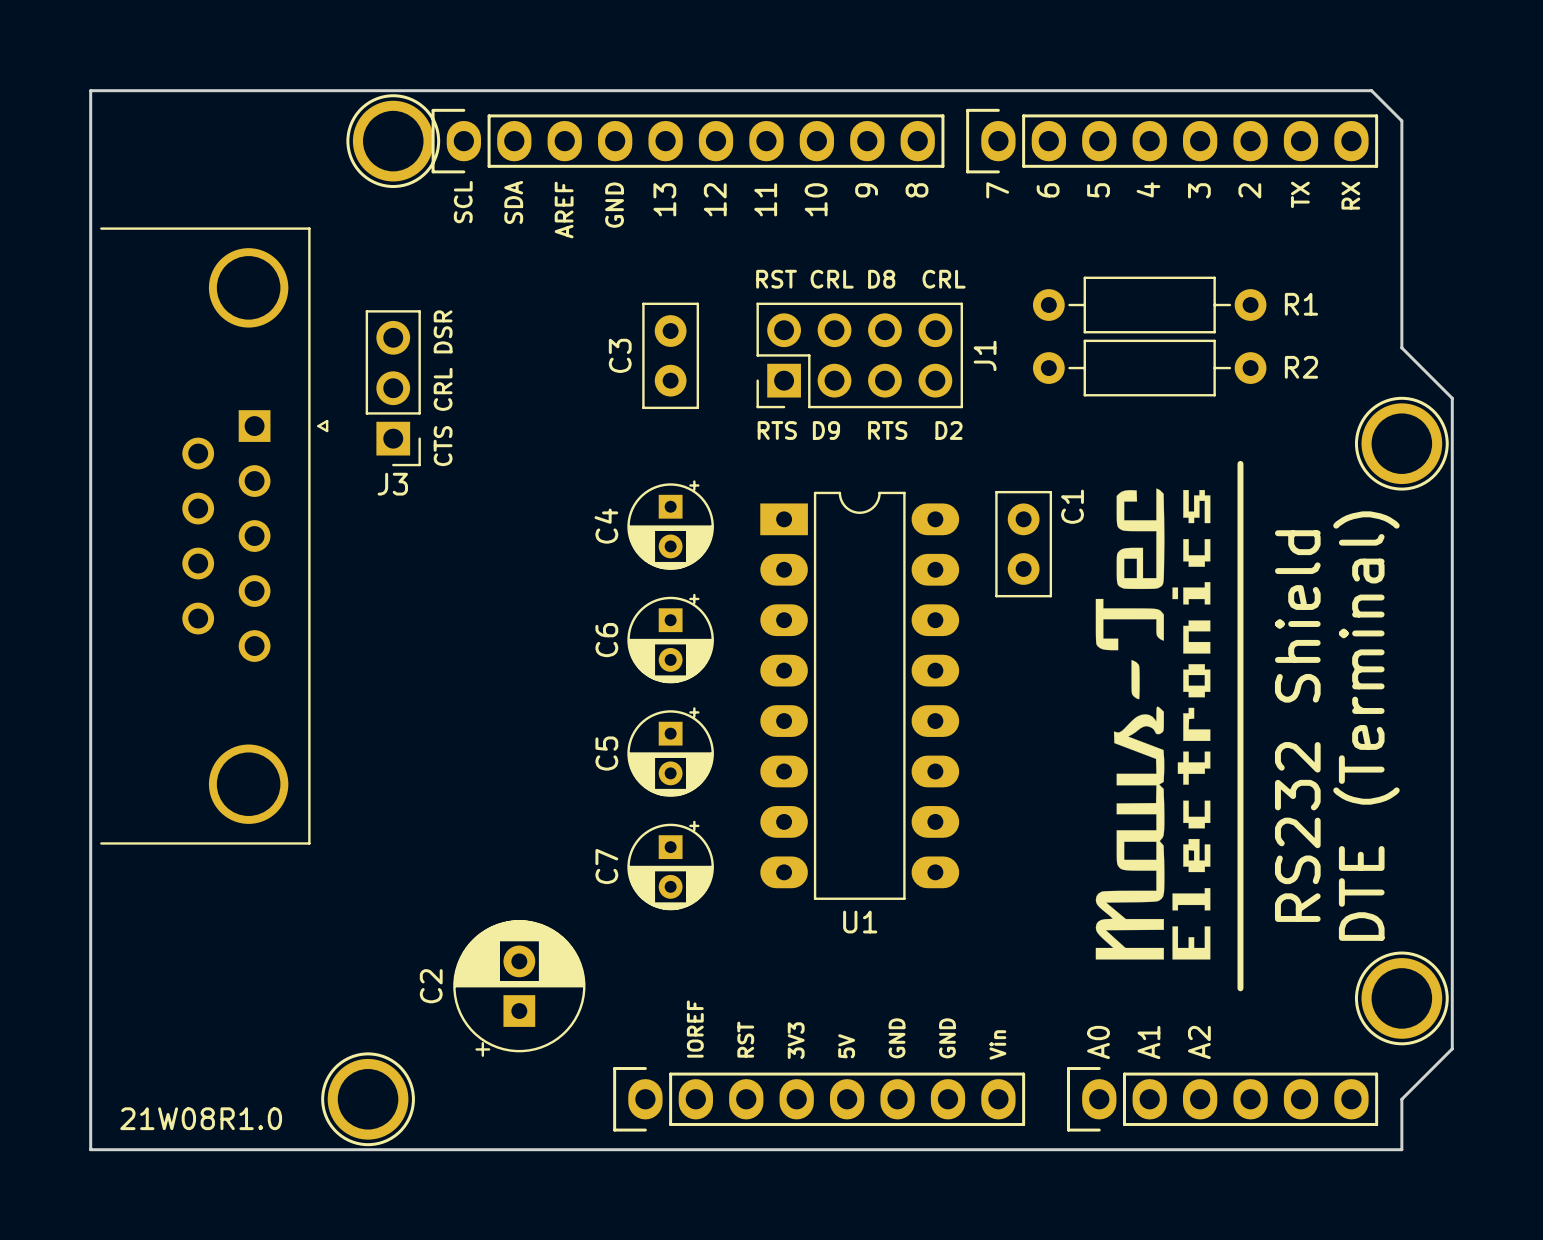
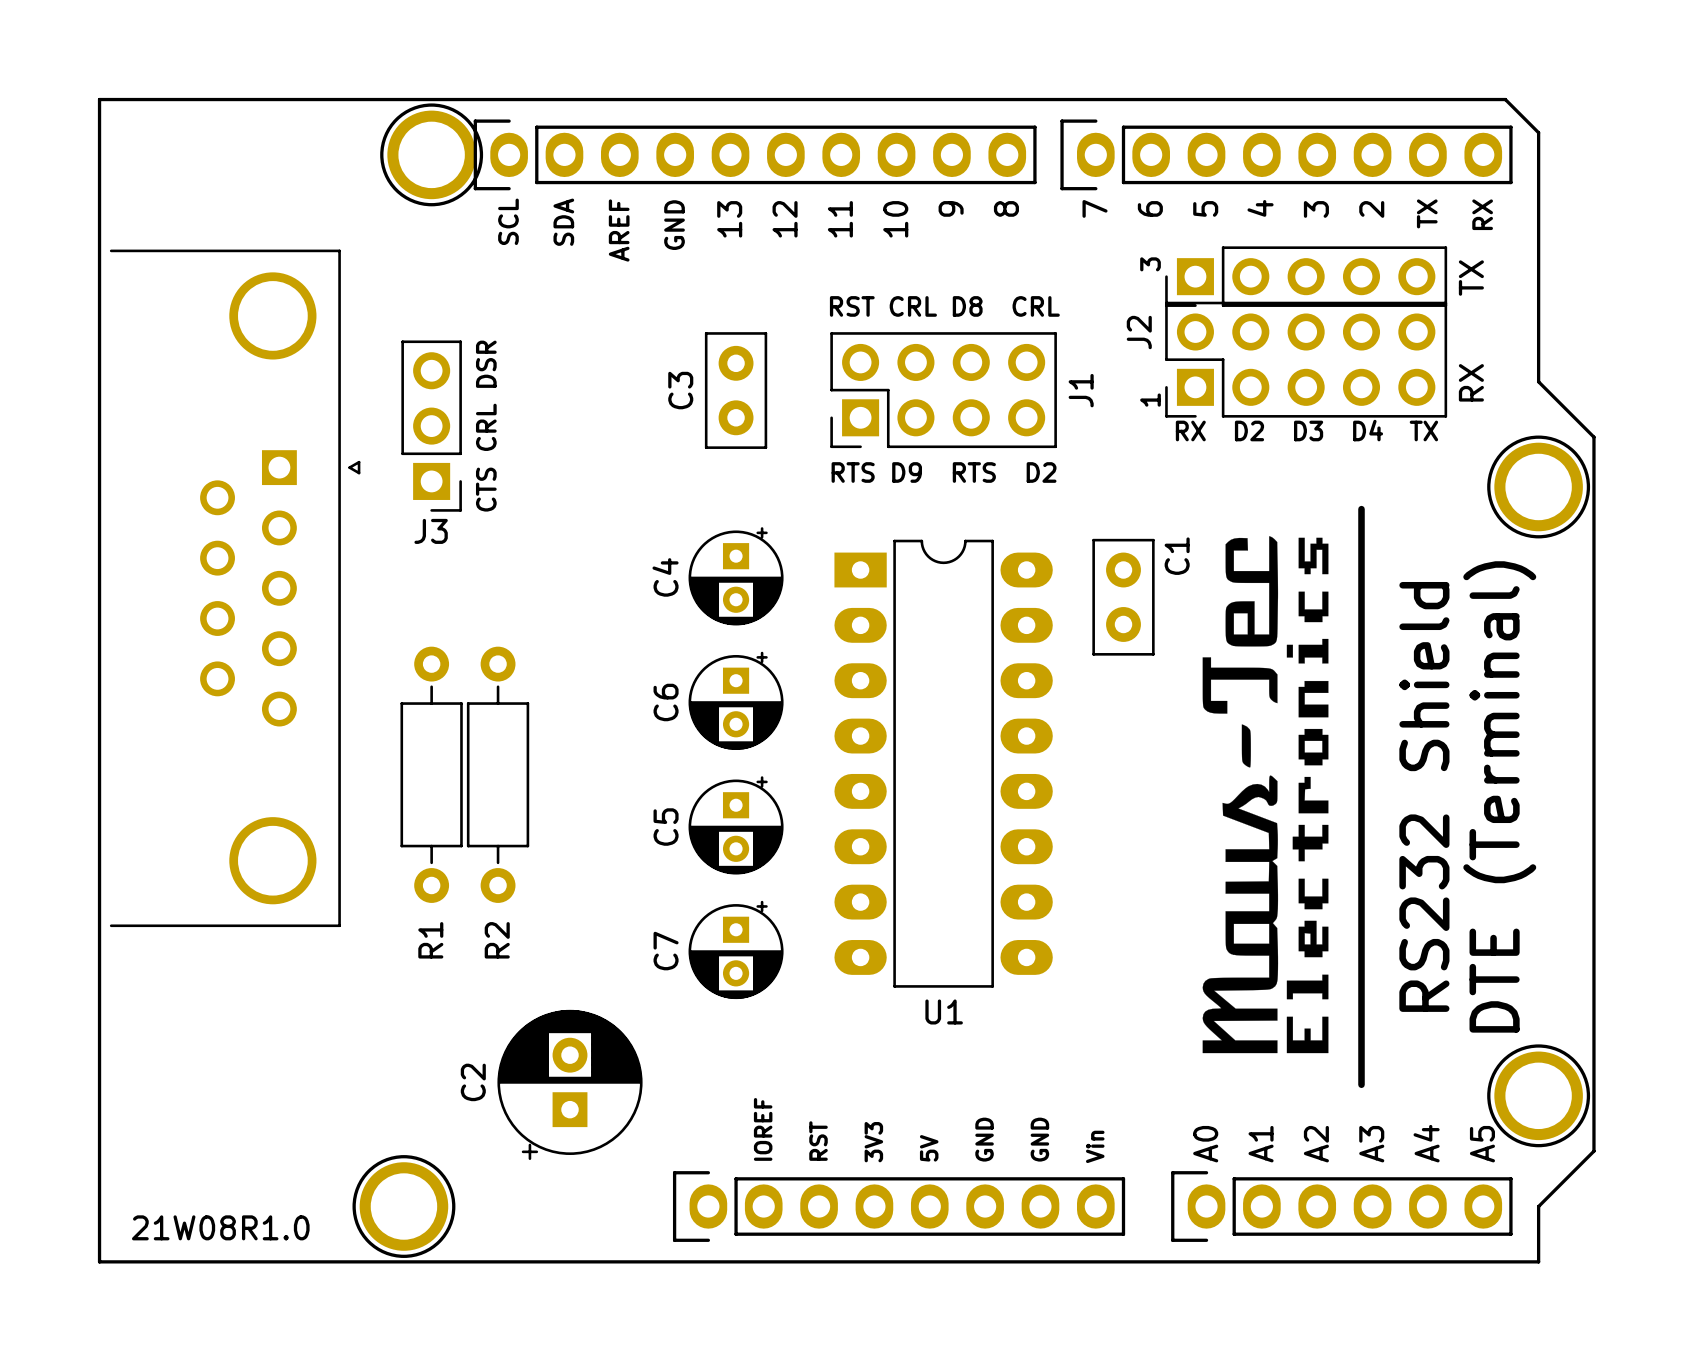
part: none -> (1306, 276)
text: none -> RX TX (1471, 330)
text: none -> 1 3 (1150, 332)
R1 rotation: 0° (1149, 305) -> 90° clockwise (431, 774)
R1 position: (1149, 305) -> (431, 774)
J2: none -> (1306, 359)
R2 rotation: 0° (1149, 368) -> 90° clockwise (498, 774)
R2 position: (1149, 368) -> (498, 774)
text: none -> RX D2 D3 D4 TX (1306, 430)
text: none -> A3 (1371, 1144)
text: none -> A4 (1426, 1143)
text: none -> A5 (1482, 1144)

